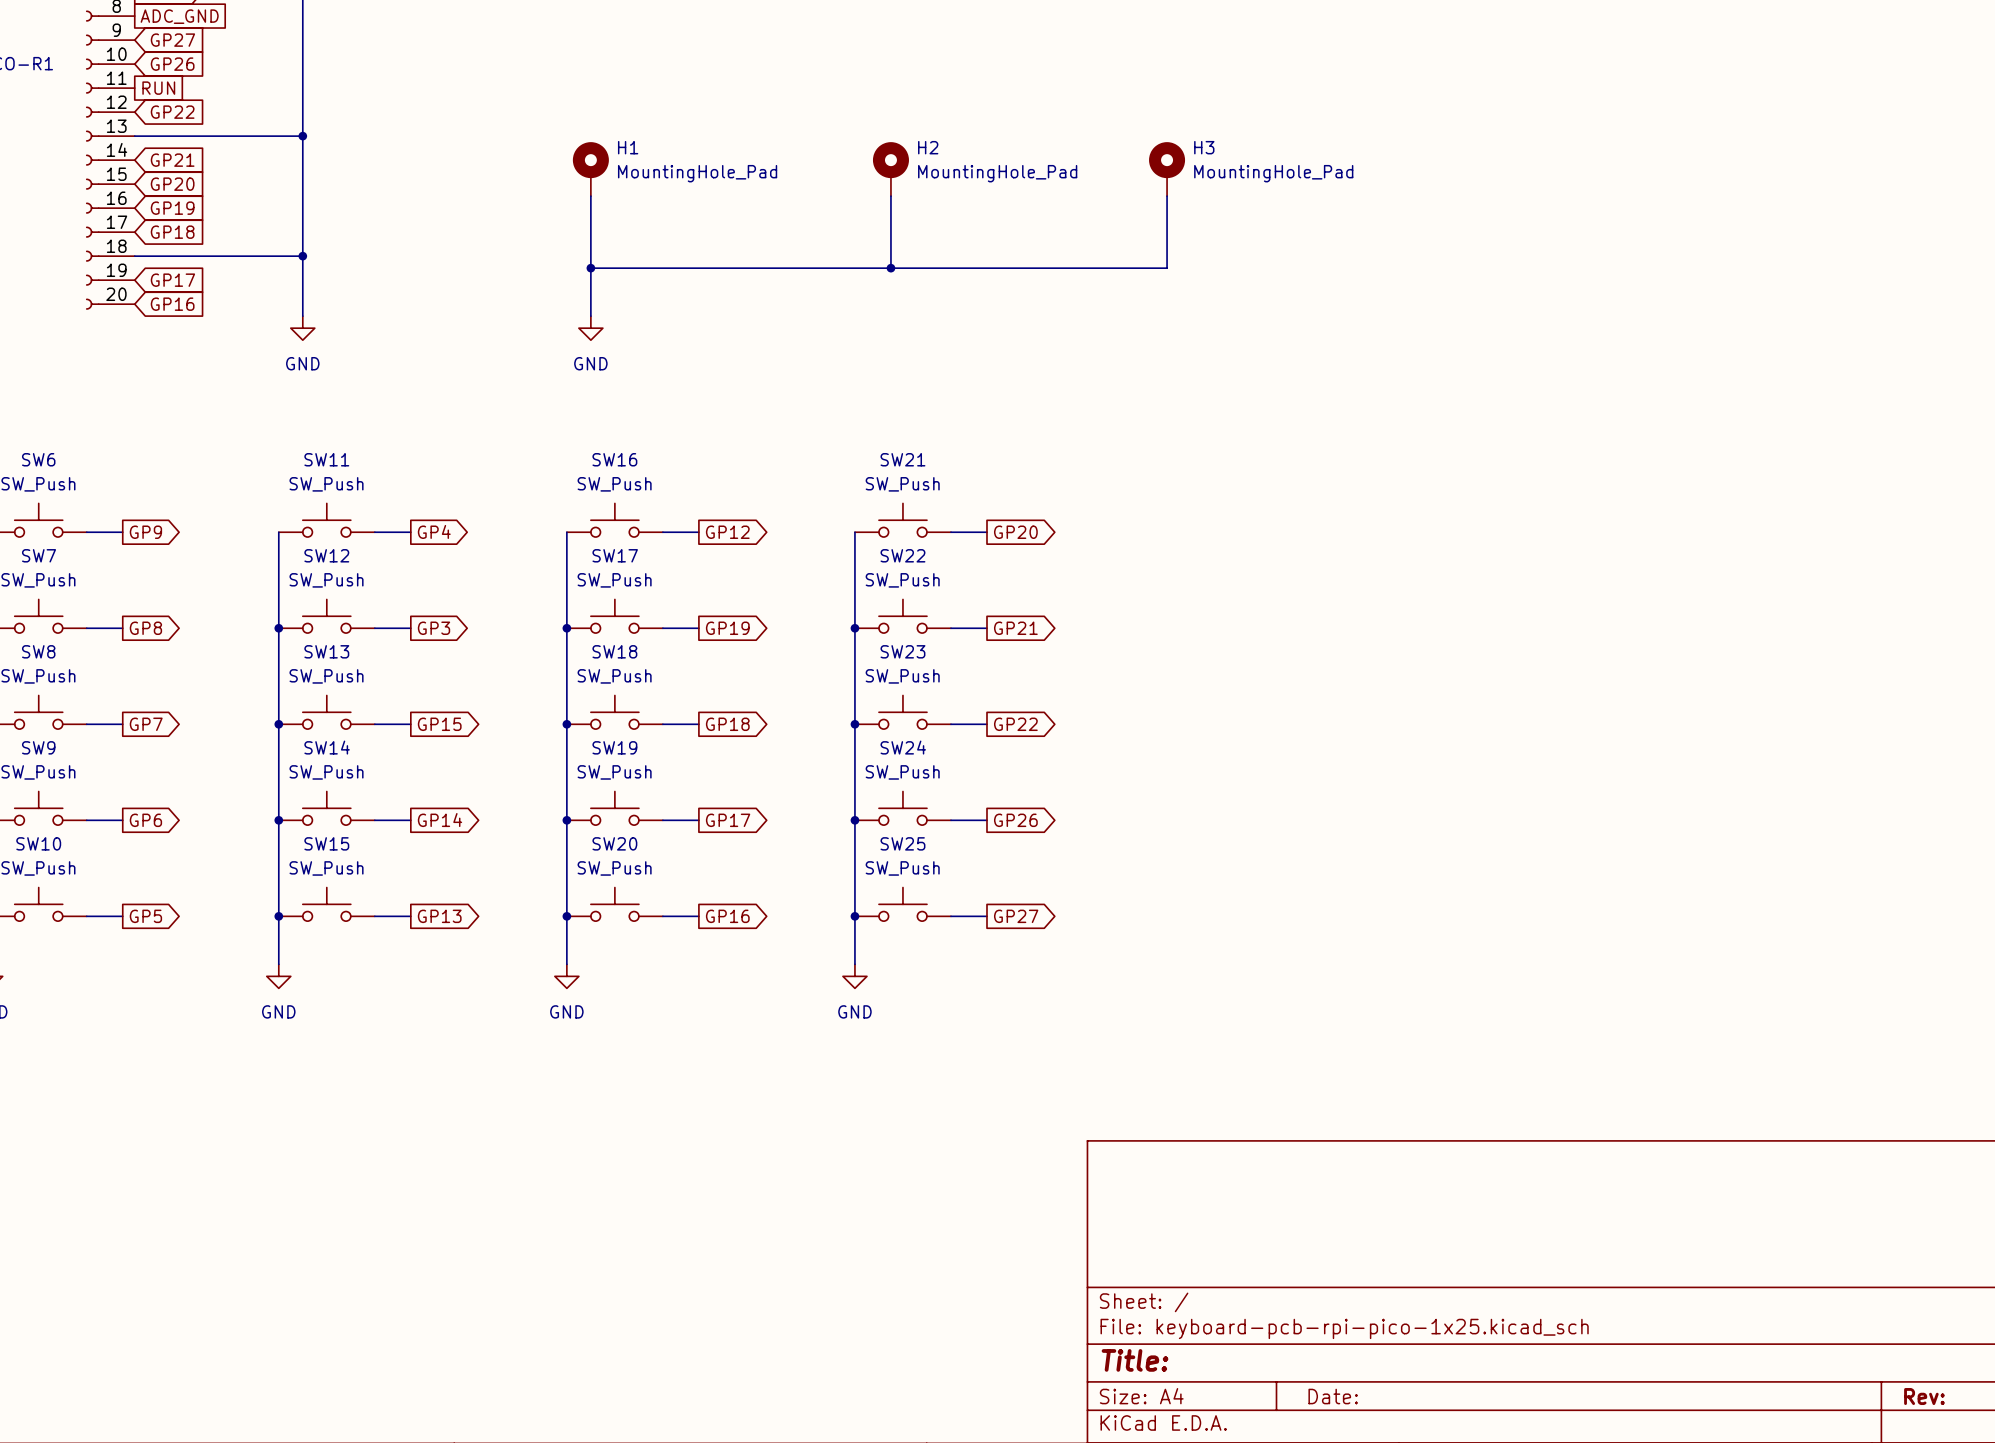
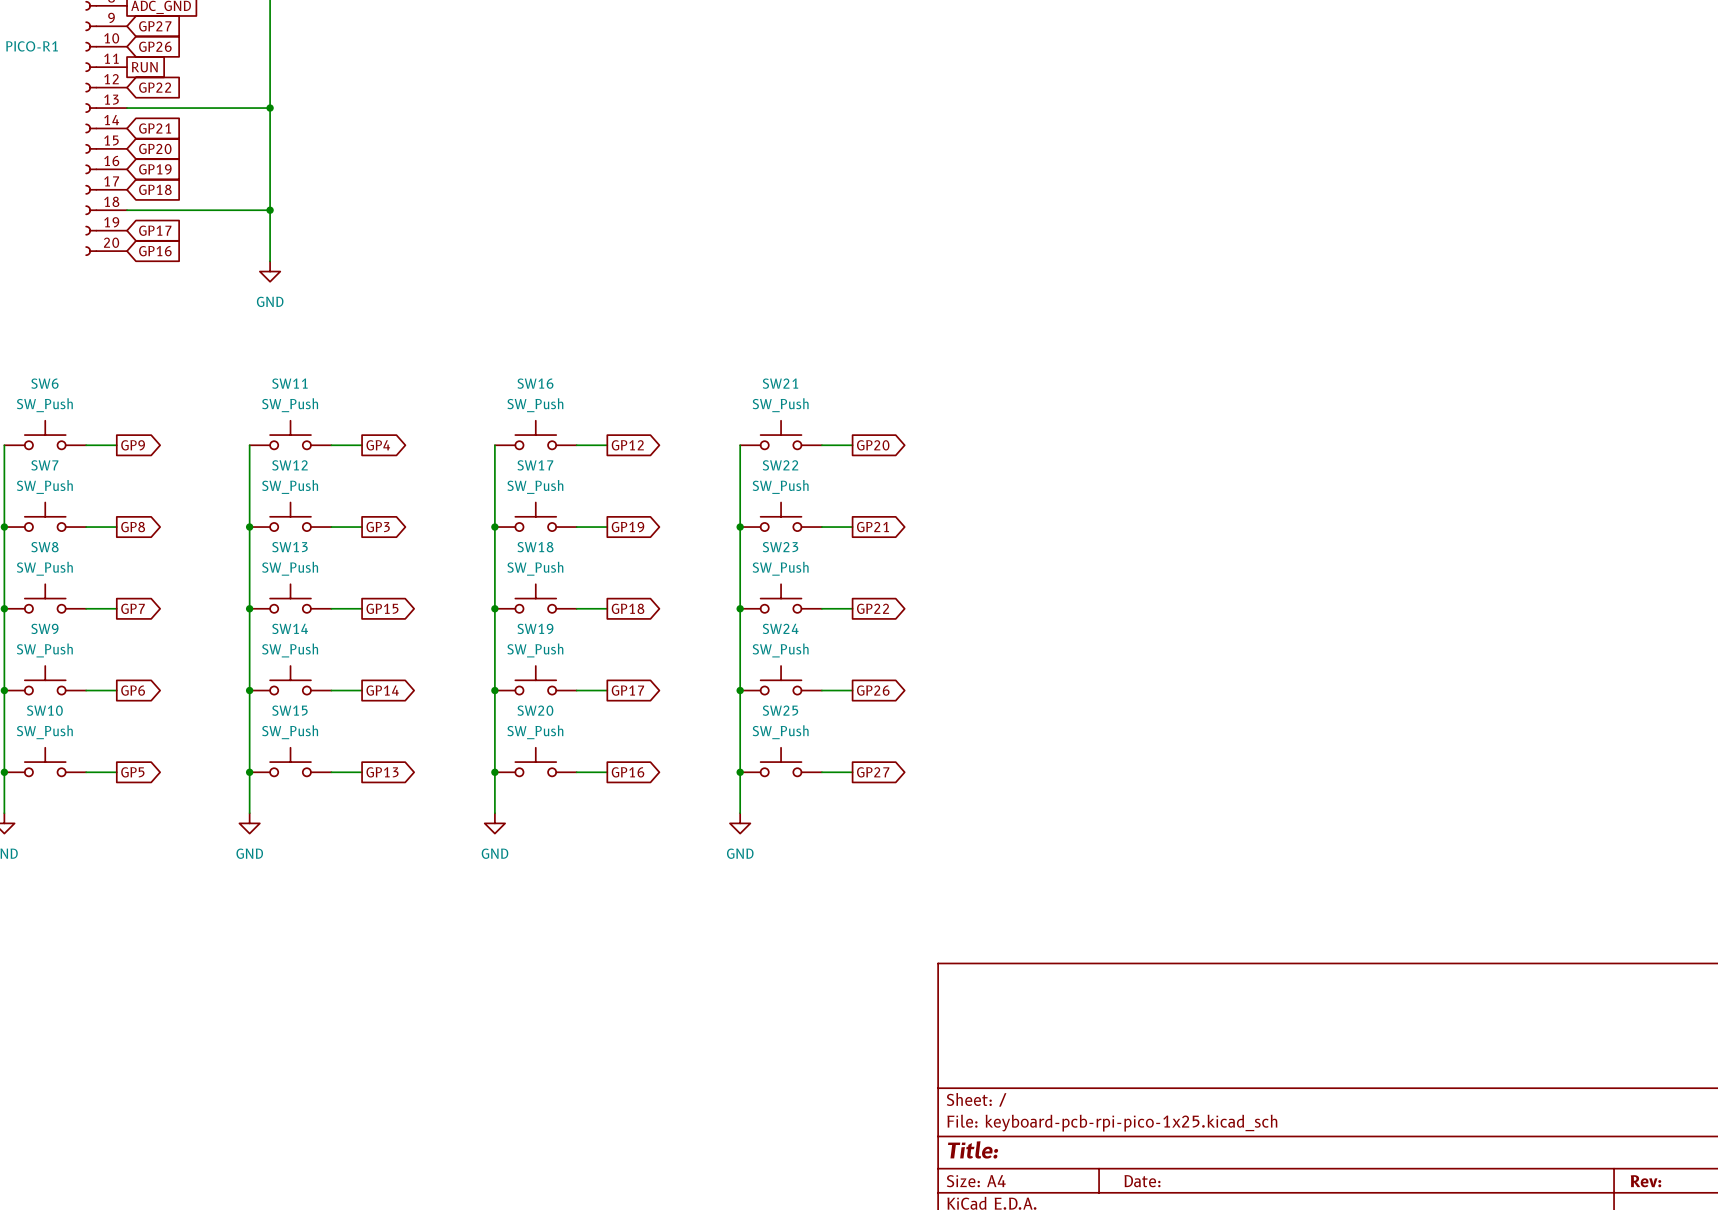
H1: MountingHole_Pad (590, 169) -> none
H2: MountingHole_Pad (890, 169) -> none
H3: MountingHole_Pad (1167, 169) -> none
wire: (590, 196) (590, 316) -> none
wire: (890, 196) (890, 268) -> none
wire: (1167, 196) (1167, 268) (590, 268) -> none
junction: (590, 268) -> none
junction: (890, 268) -> none
power symbol: GND (590, 328) -> none

